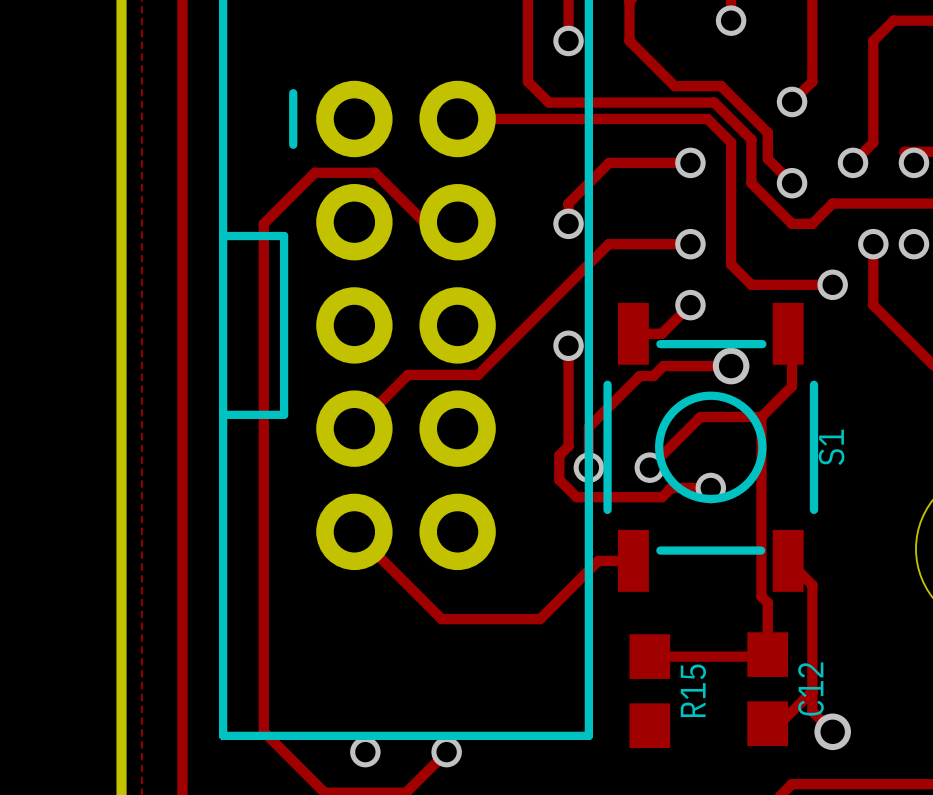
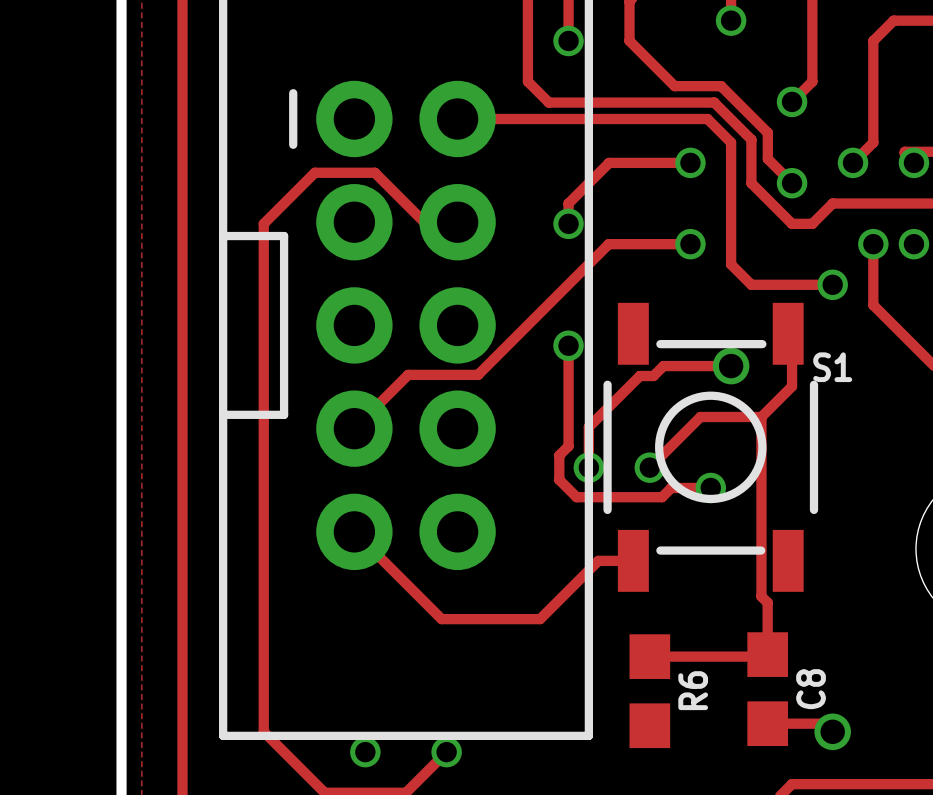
track: (690, 305) (661, 333) (633, 333) -> none
via: (690, 305) -> none
S1 name rotation: 0° (831, 447) -> 90° clockwise (832, 367)
S1 name position: S1 (831, 447) -> S1 (832, 367)
track: (788, 560) (812, 585) (812, 711) (824, 723) -> none
C12 name: C12 (811, 689) -> C8 (811, 689)
R15 name: R15 (693, 690) -> R6 (693, 690)
track: (812, 691) (779, 723) -> (824, 723) (779, 723)

